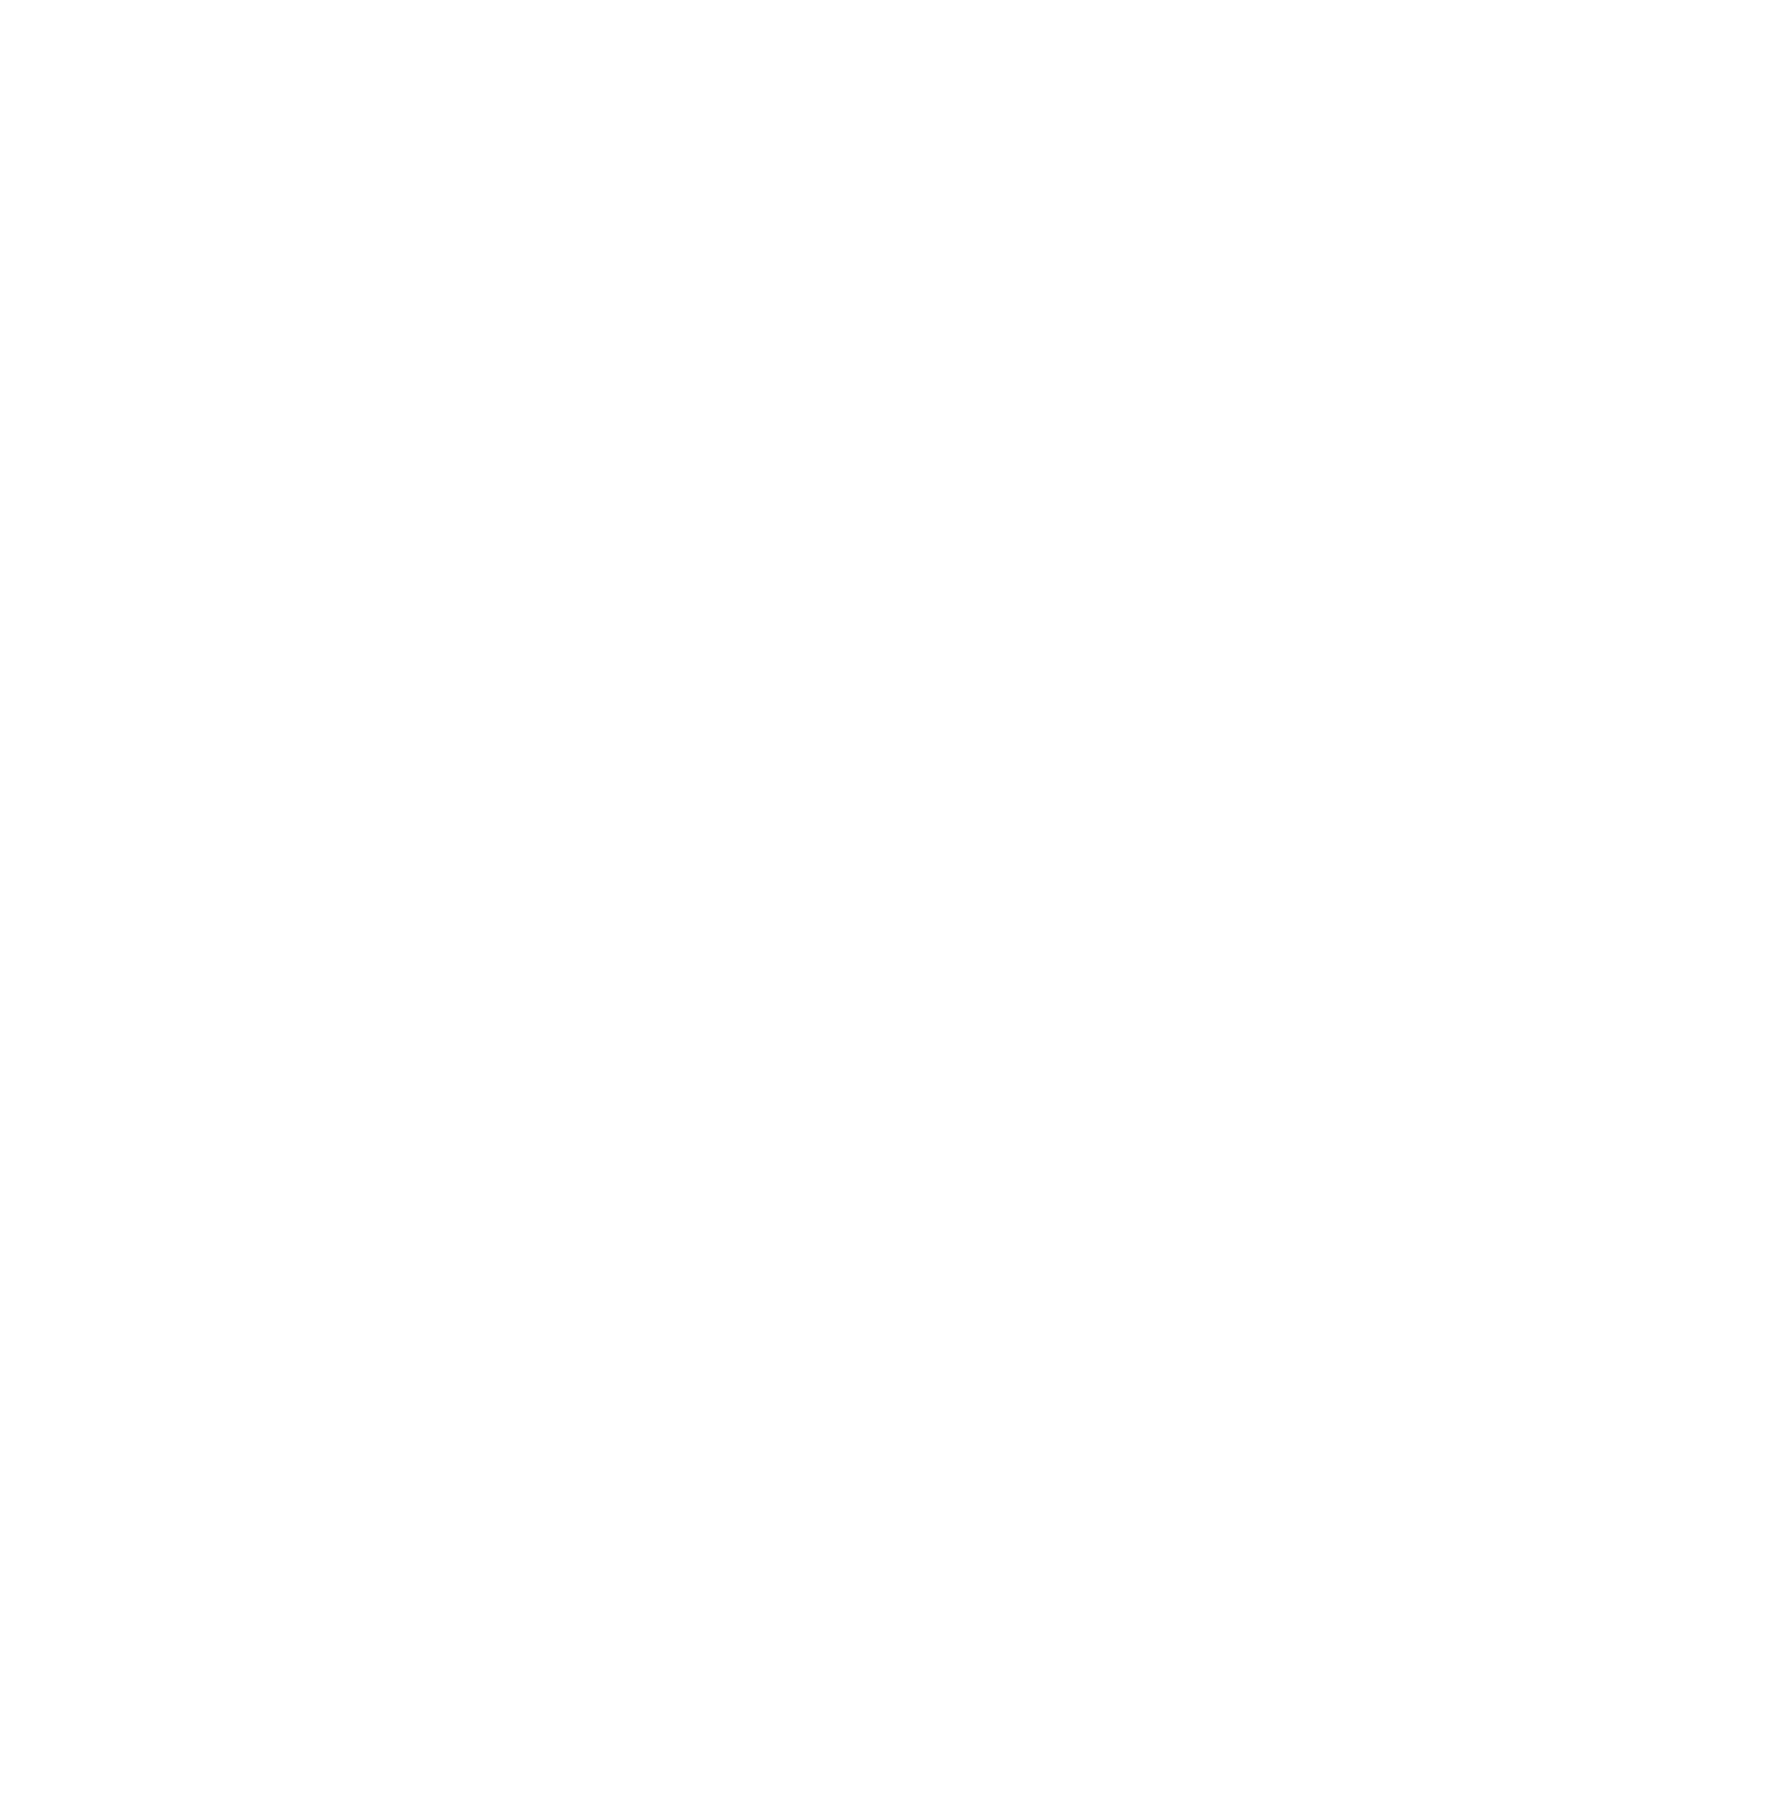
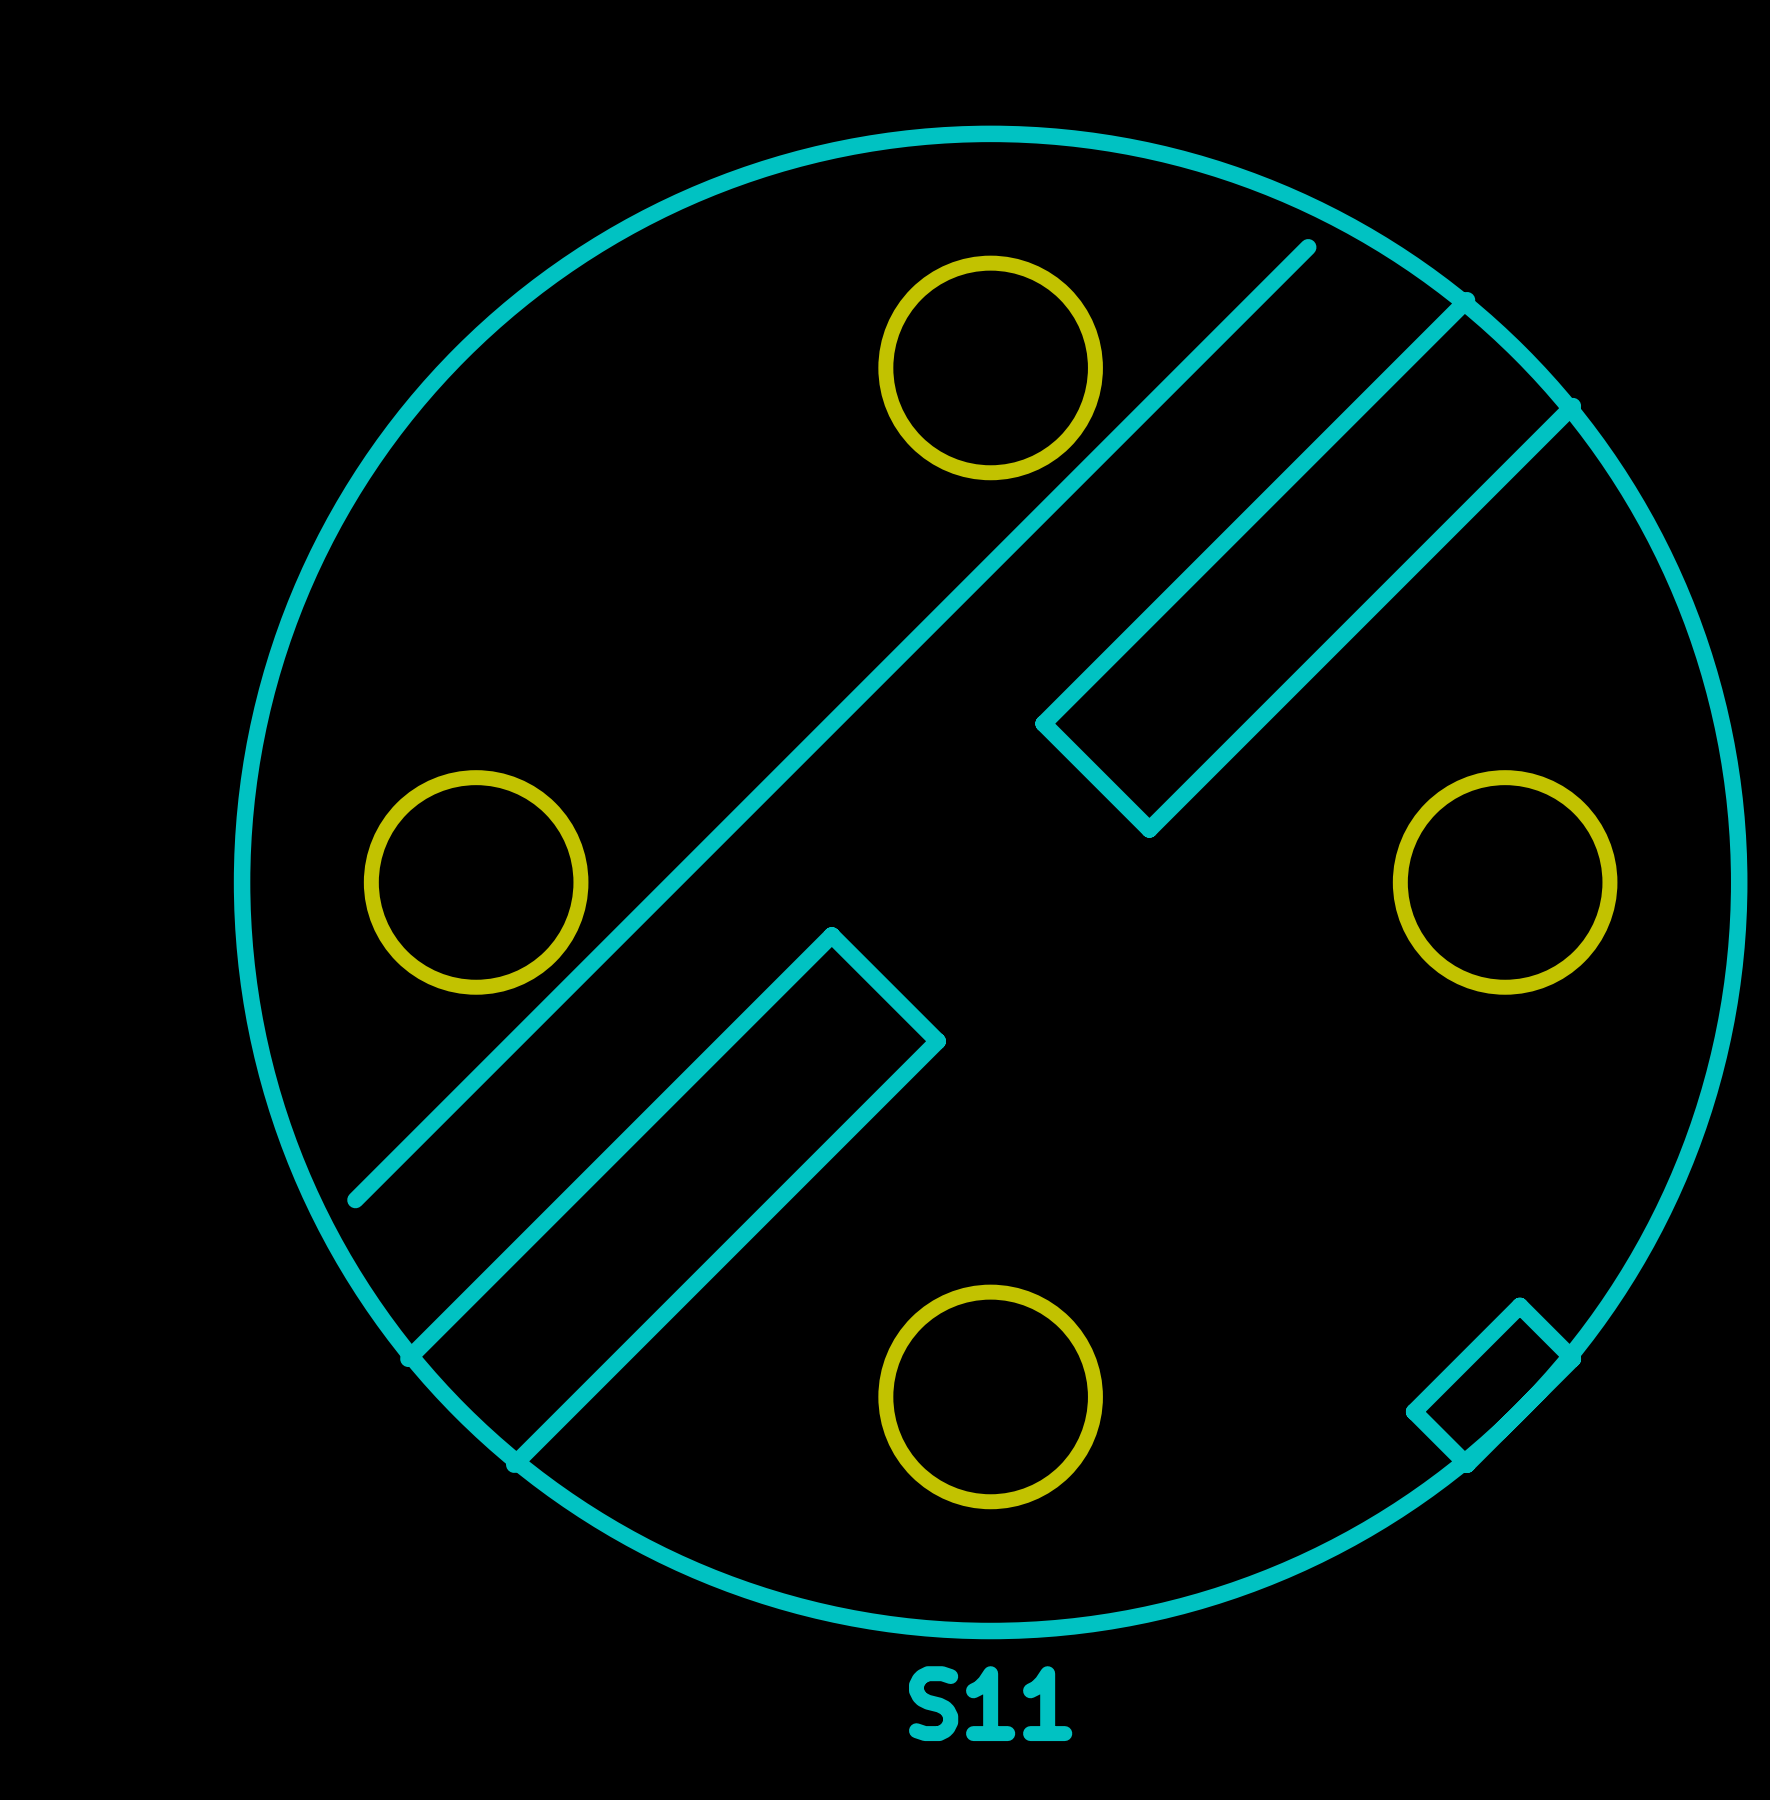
S11: none -> (990, 882)

